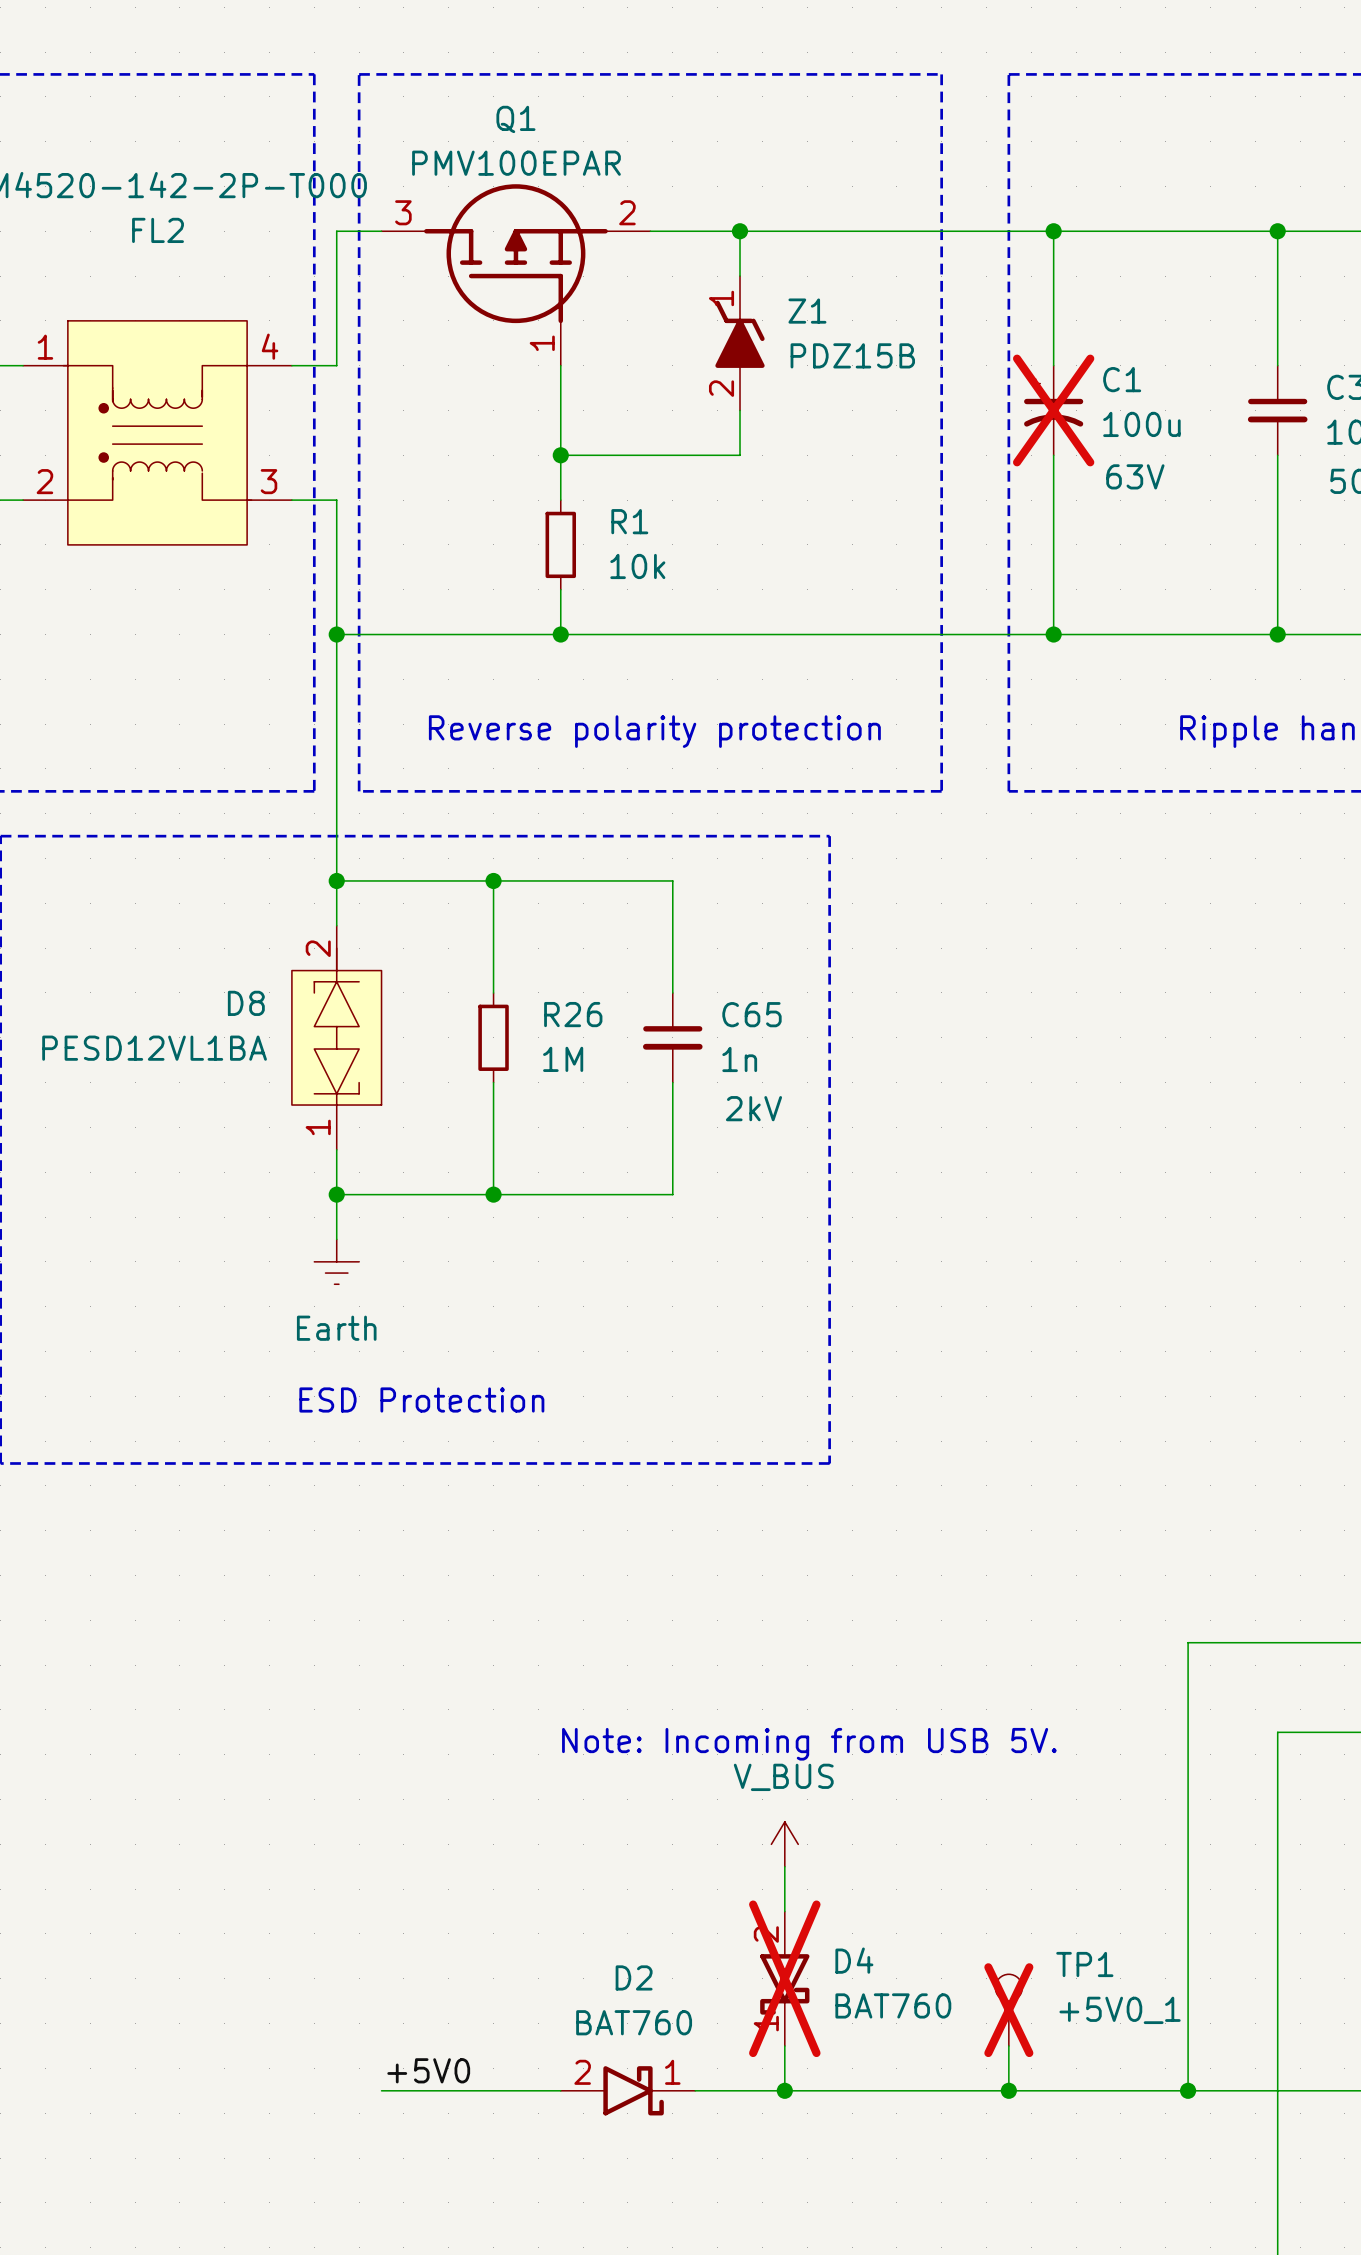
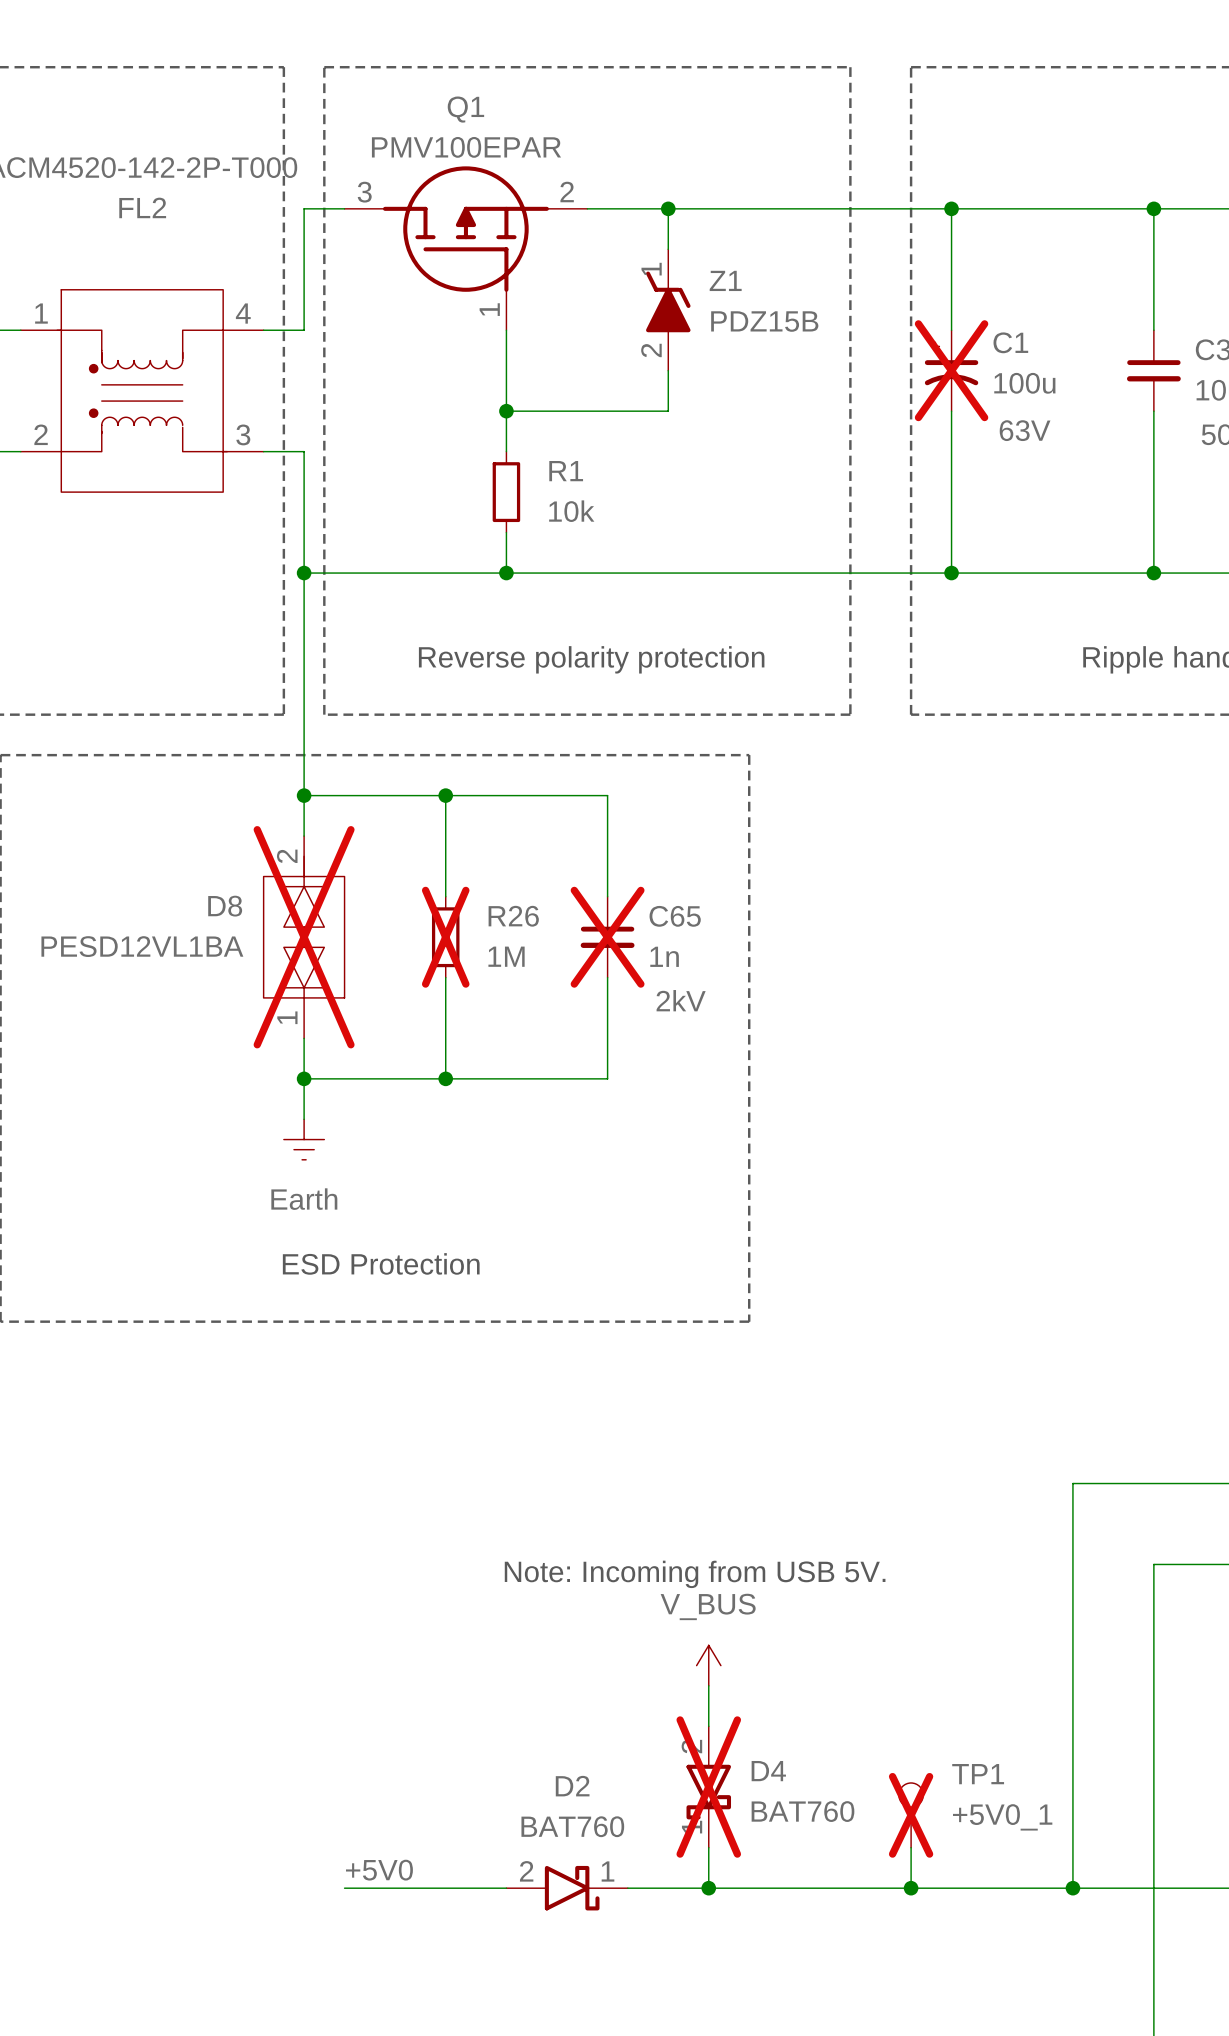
D8 do-not-place cross: none -> (304, 937)
R26 do-not-place cross: none -> (445, 937)
C65 do-not-place cross: none -> (607, 937)

